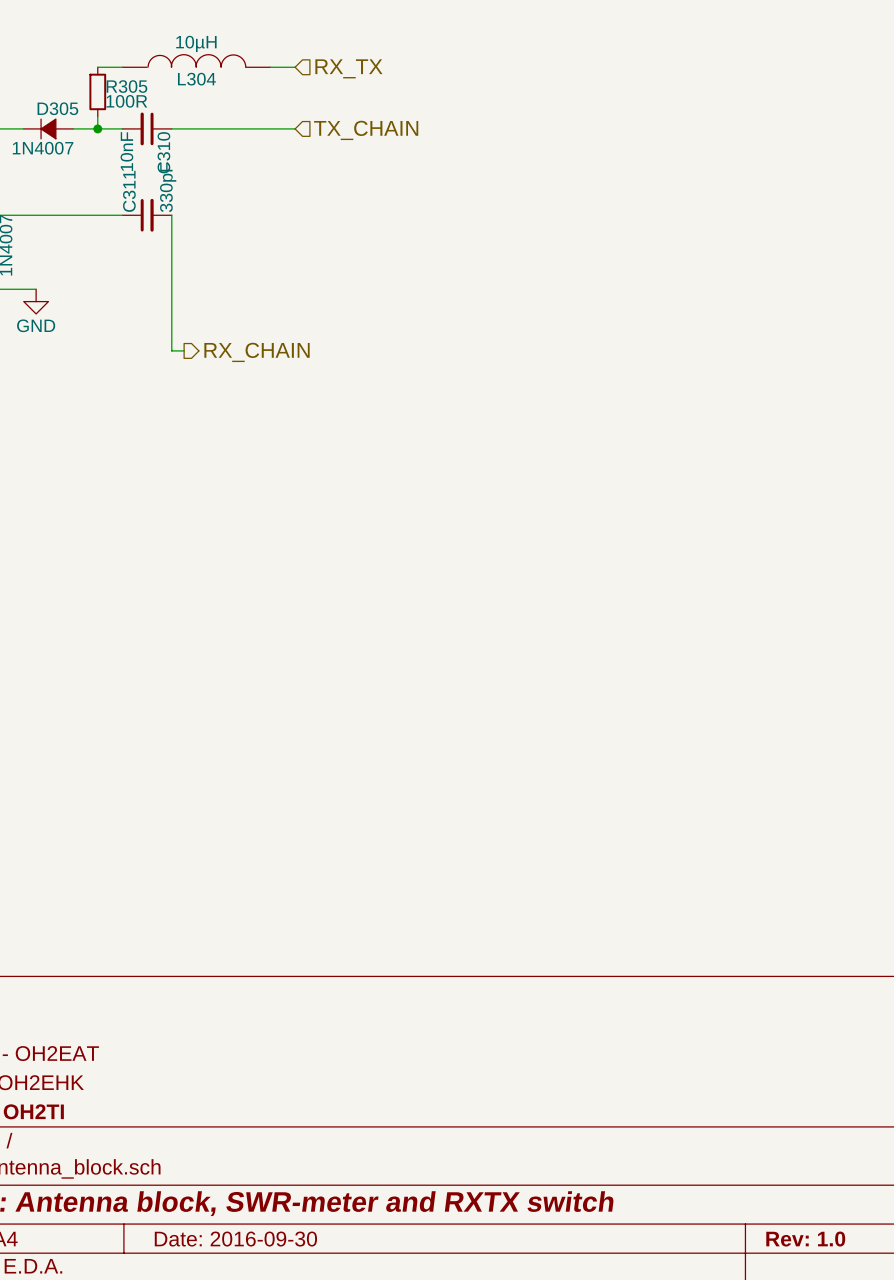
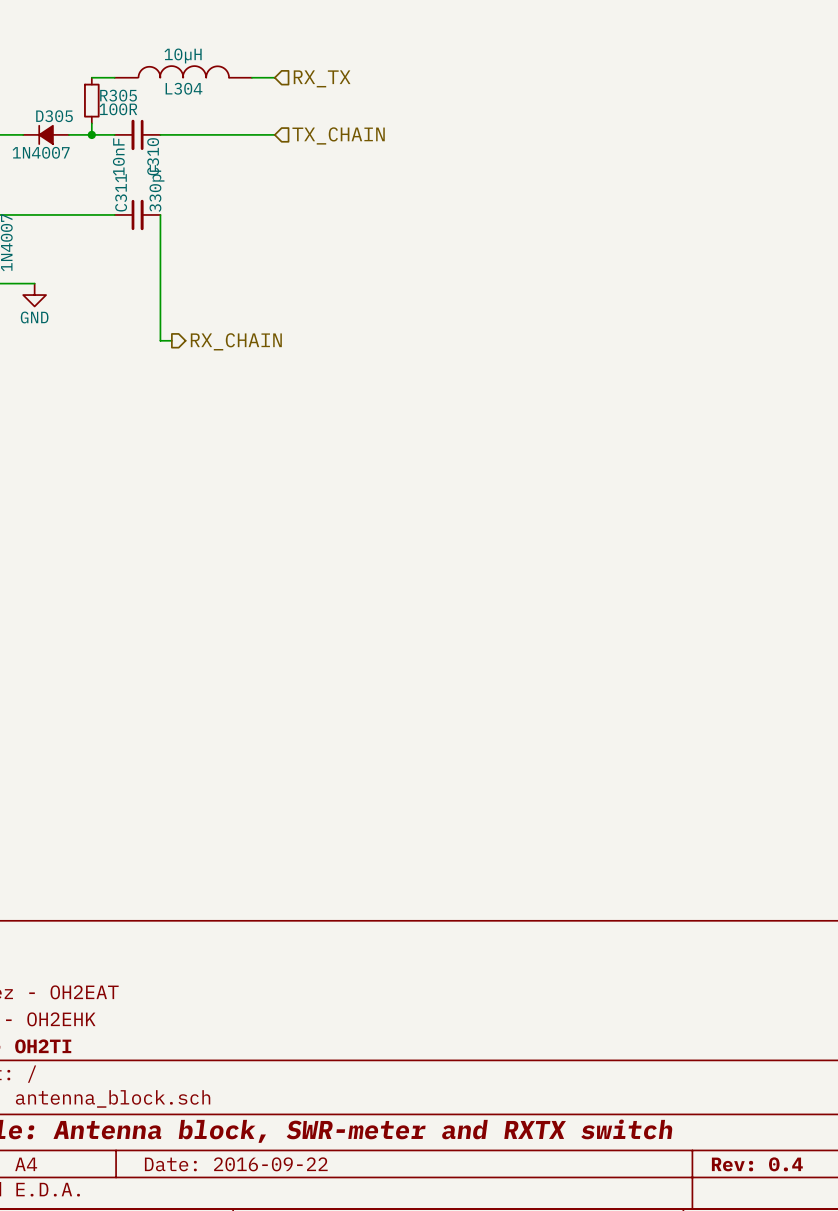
title block: Date: 2016-09-30 (235, 1239) -> Date: 2016-09-22 (236, 1164)
title block: Rev: 1.0 (805, 1239) -> Rev: 0.4 (757, 1164)

